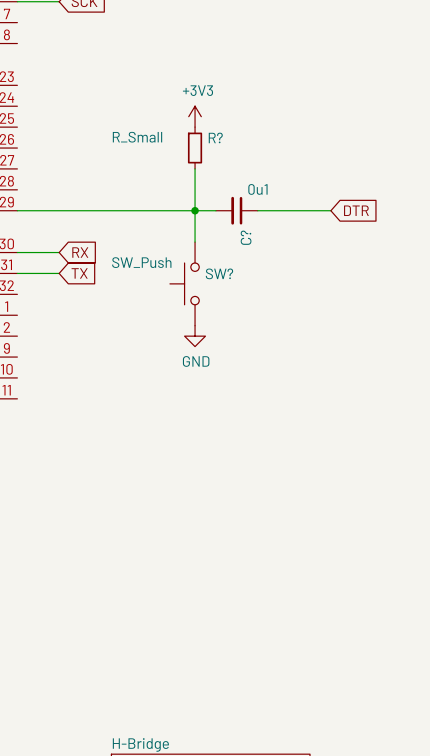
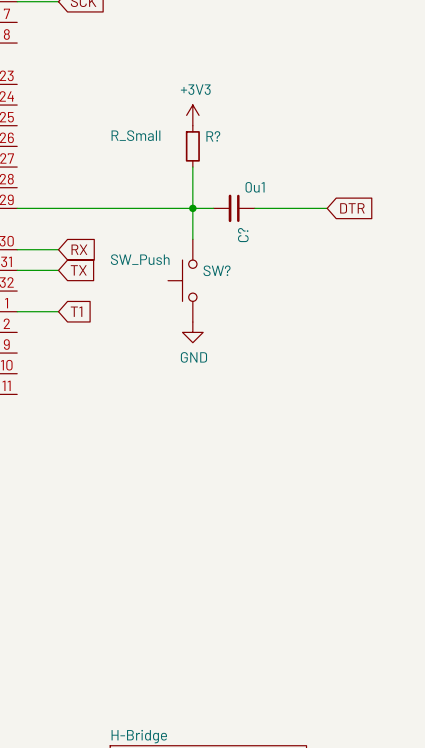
wire: none -> (17, 311) (58, 311)
global label: none -> T1 (76, 311)

